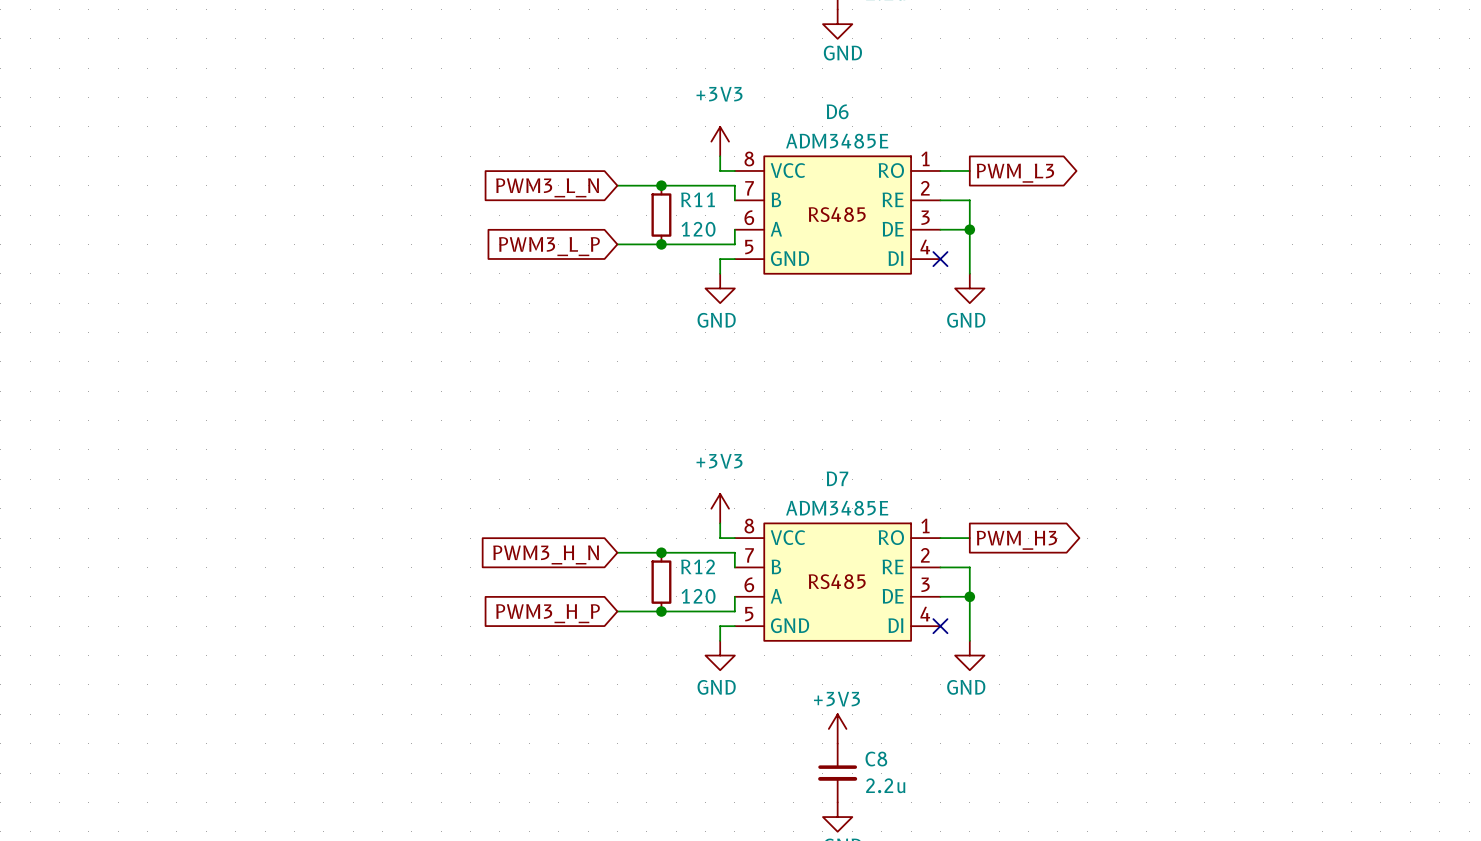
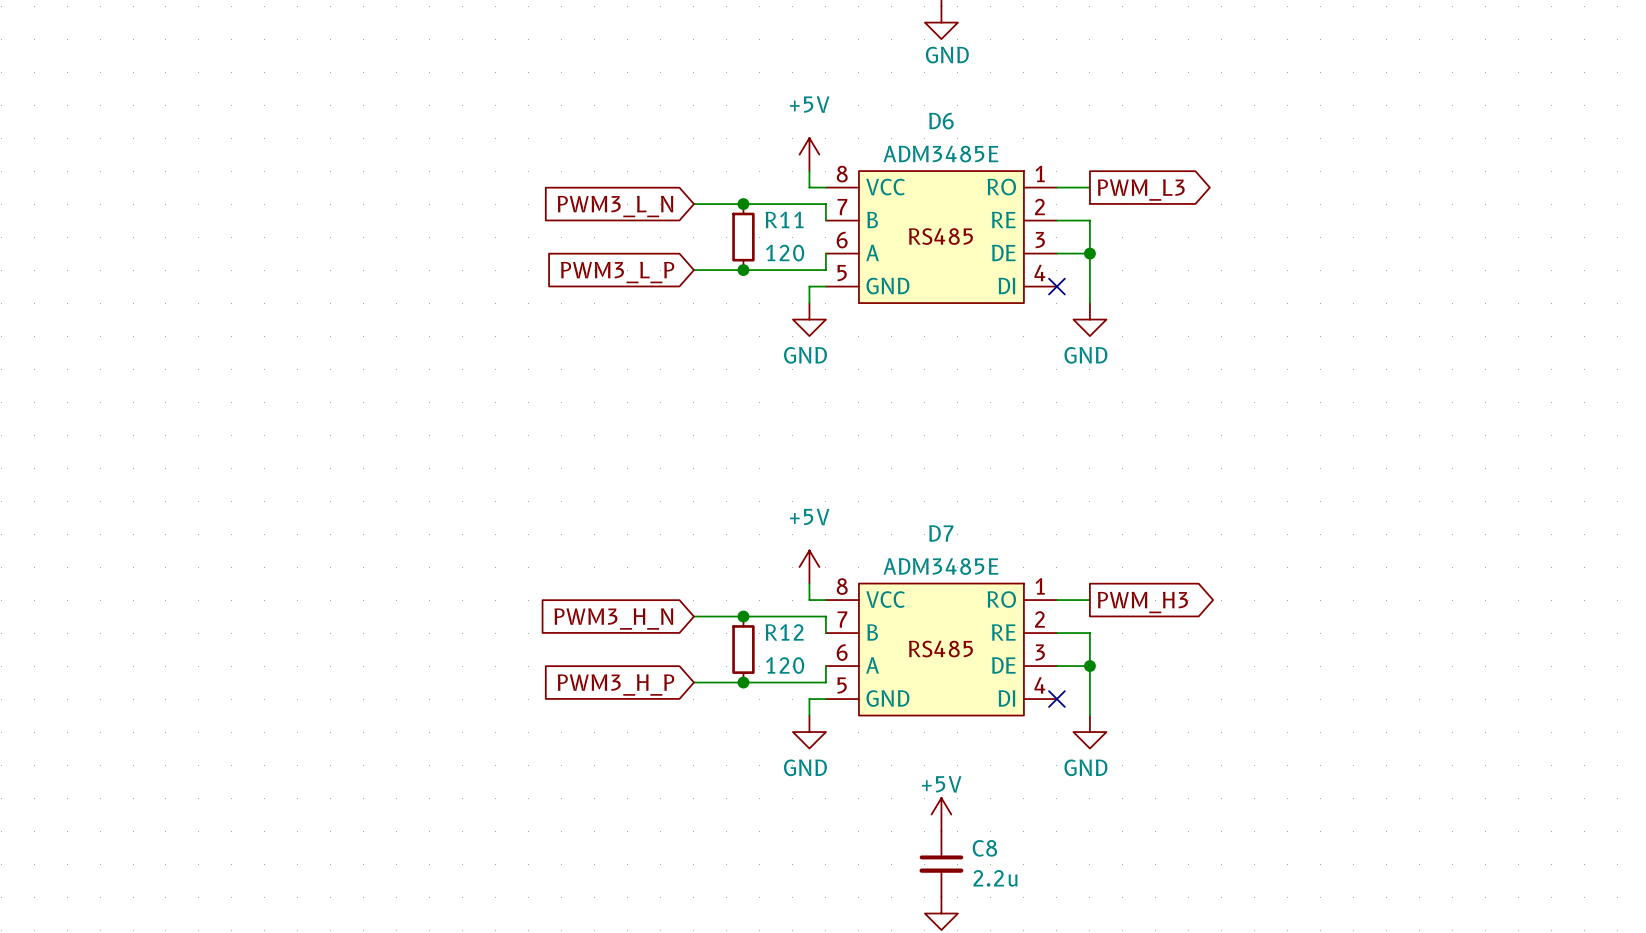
power symbol: +3V3 (720, 141) -> +5V (809, 154)
power symbol: +3V3 (720, 508) -> +5V (809, 567)
power symbol: +3V3 (837, 728) -> +5V (941, 814)

